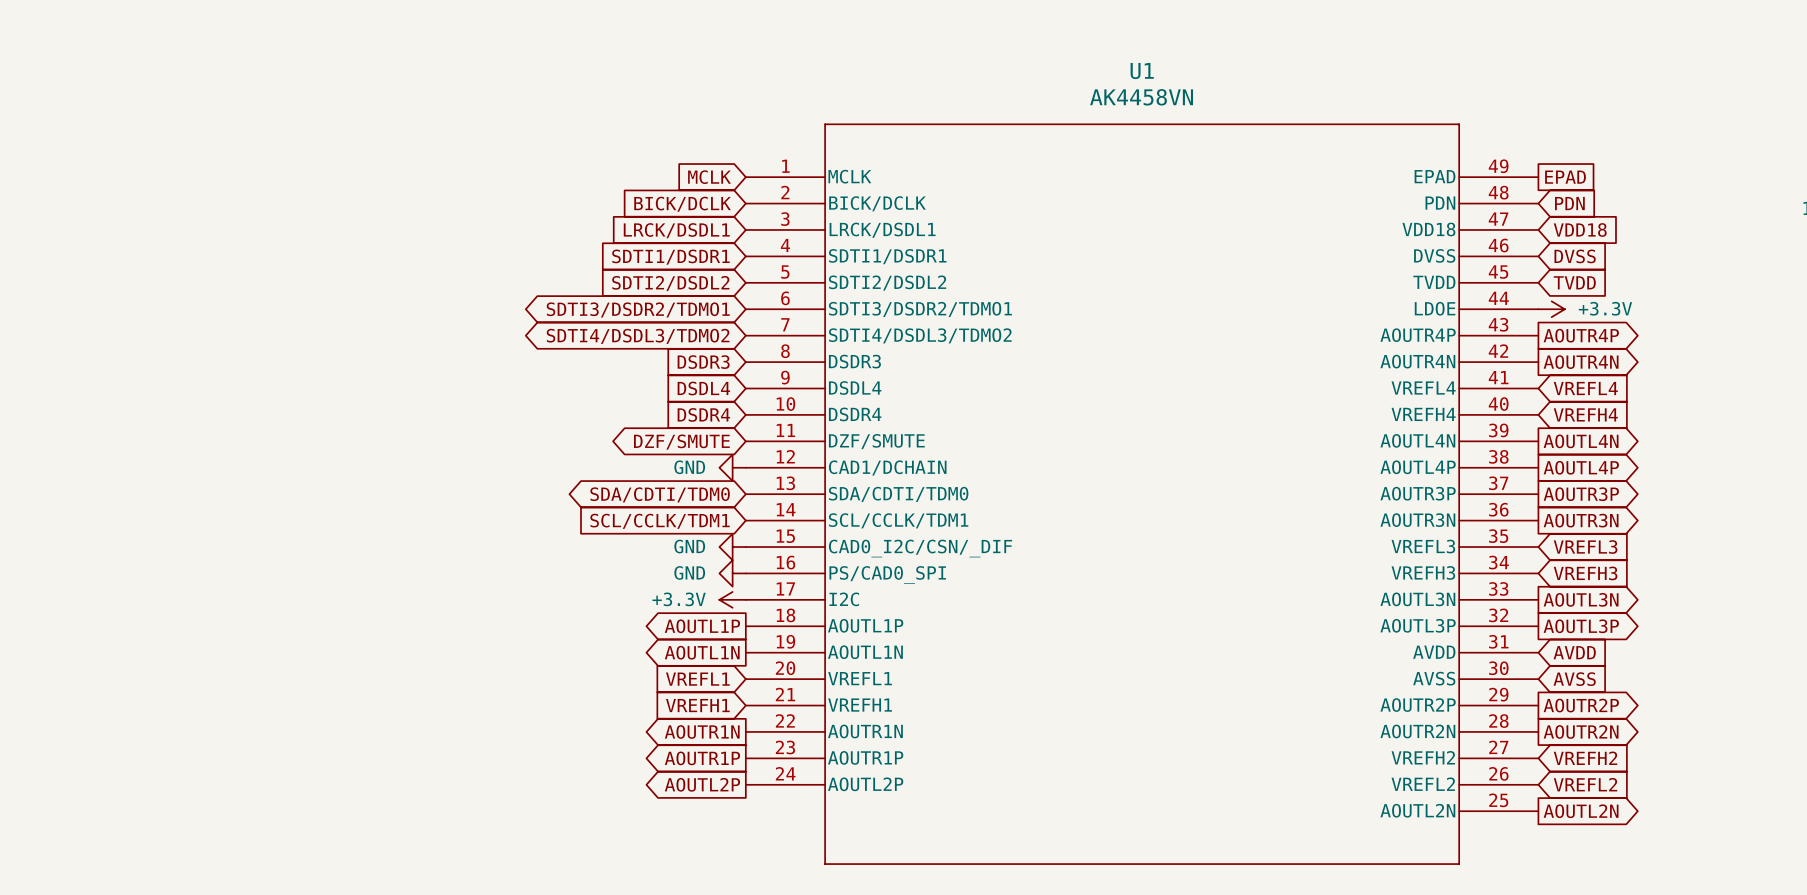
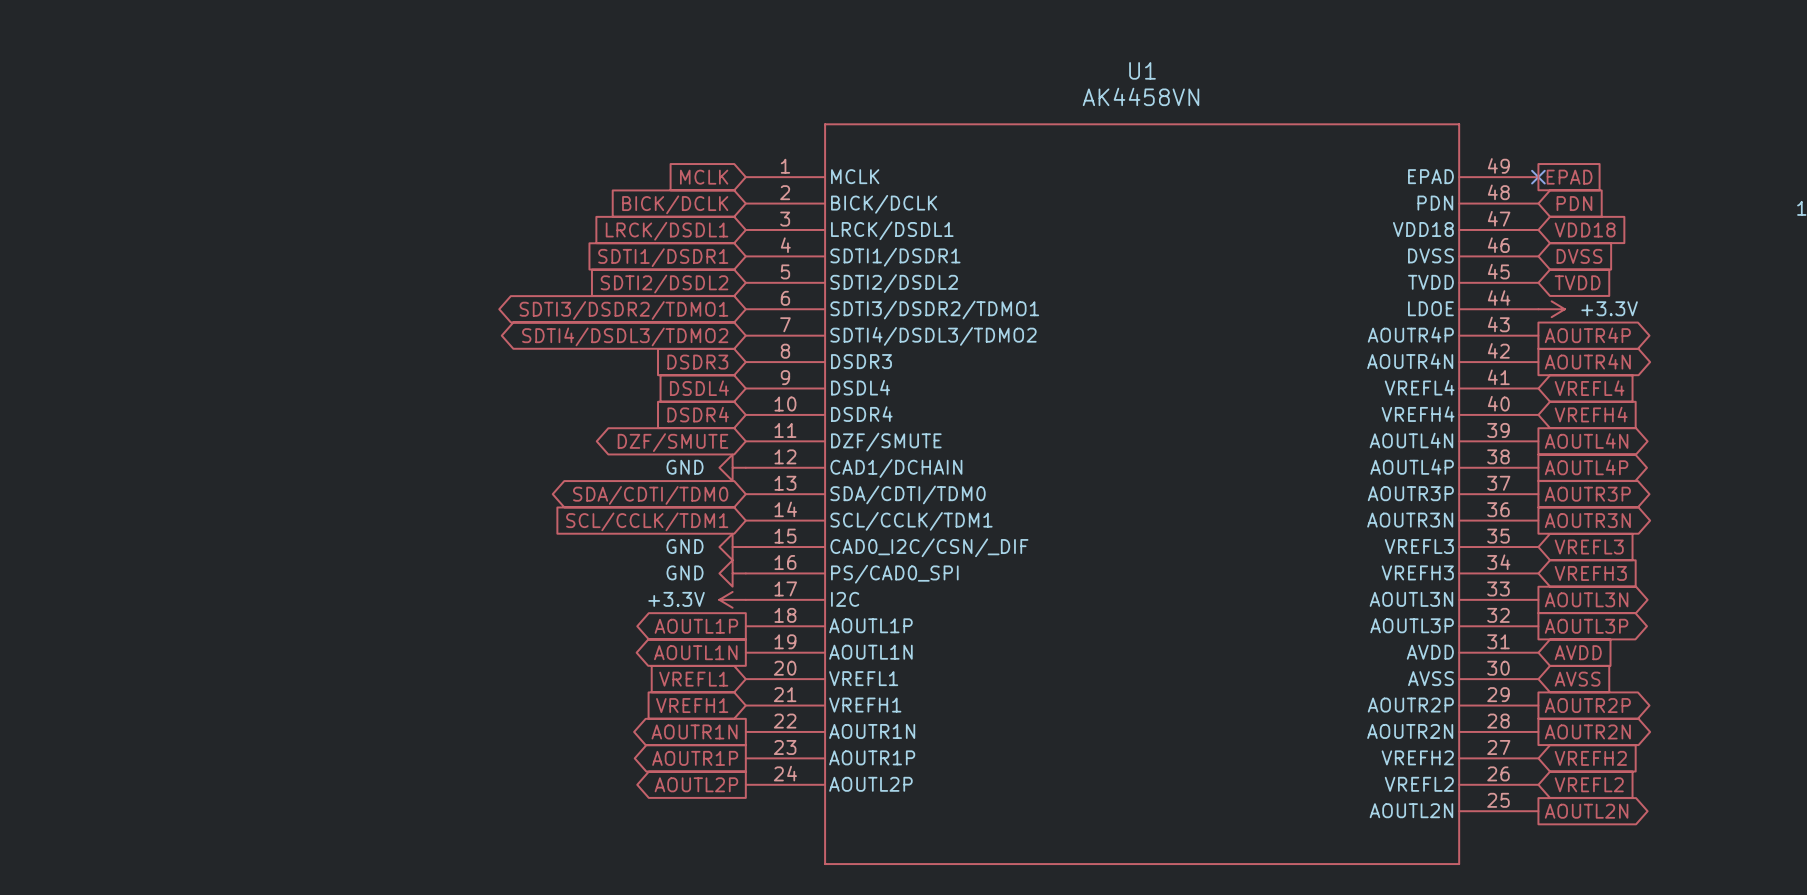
no-connect mark: none -> (1538, 177)

